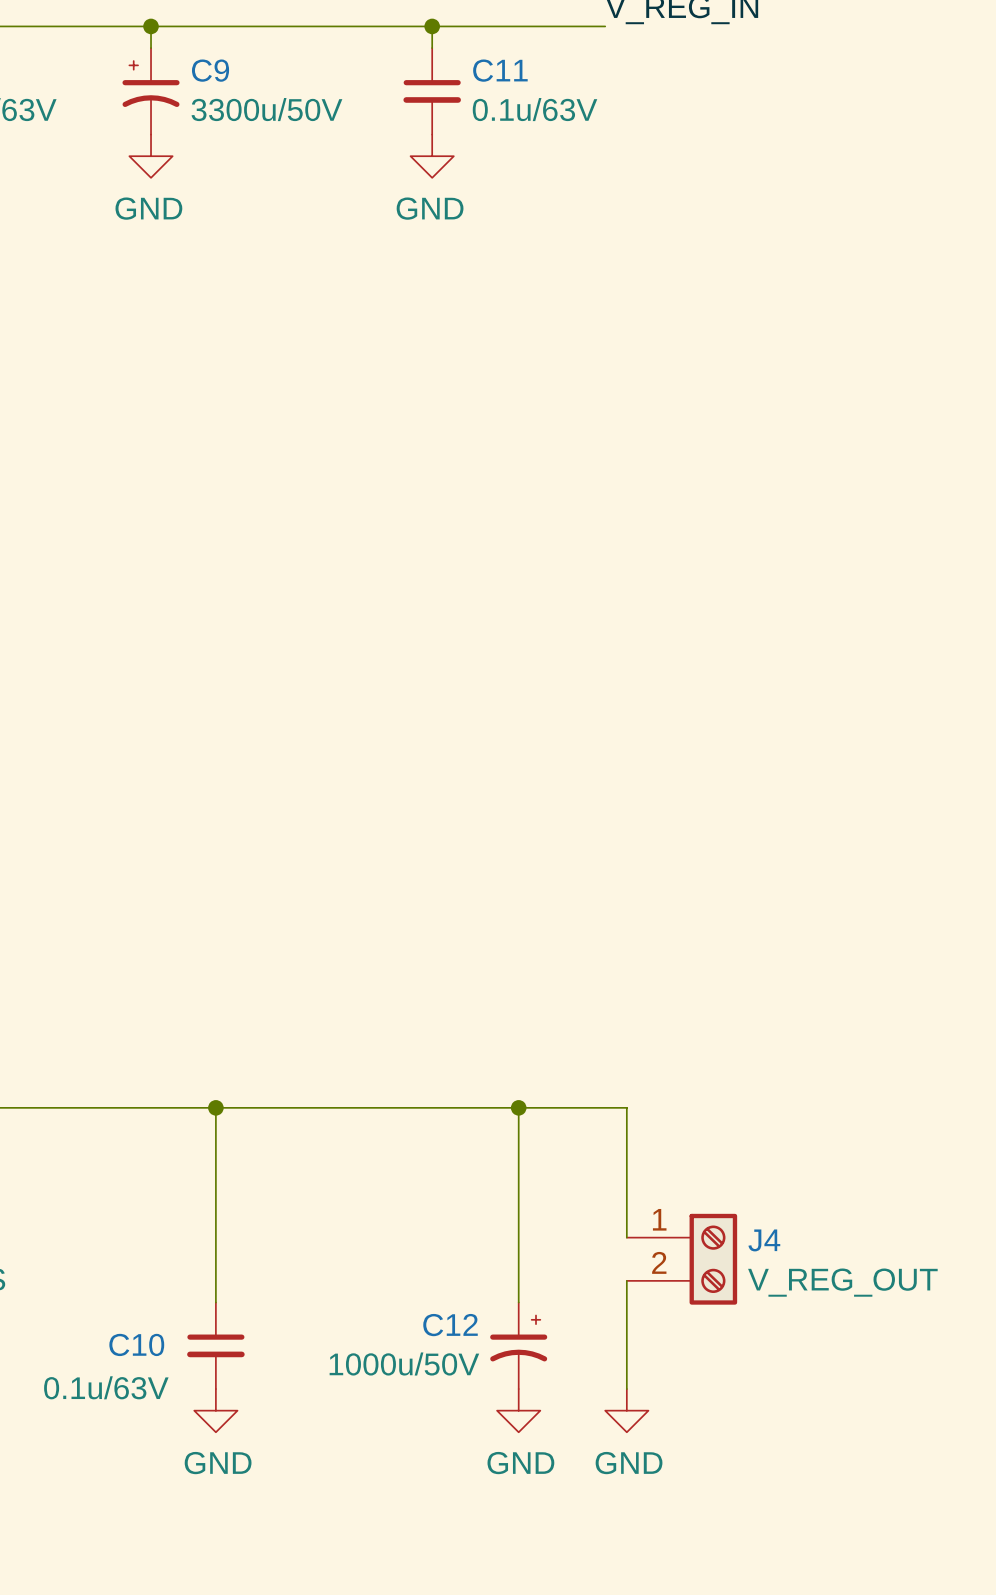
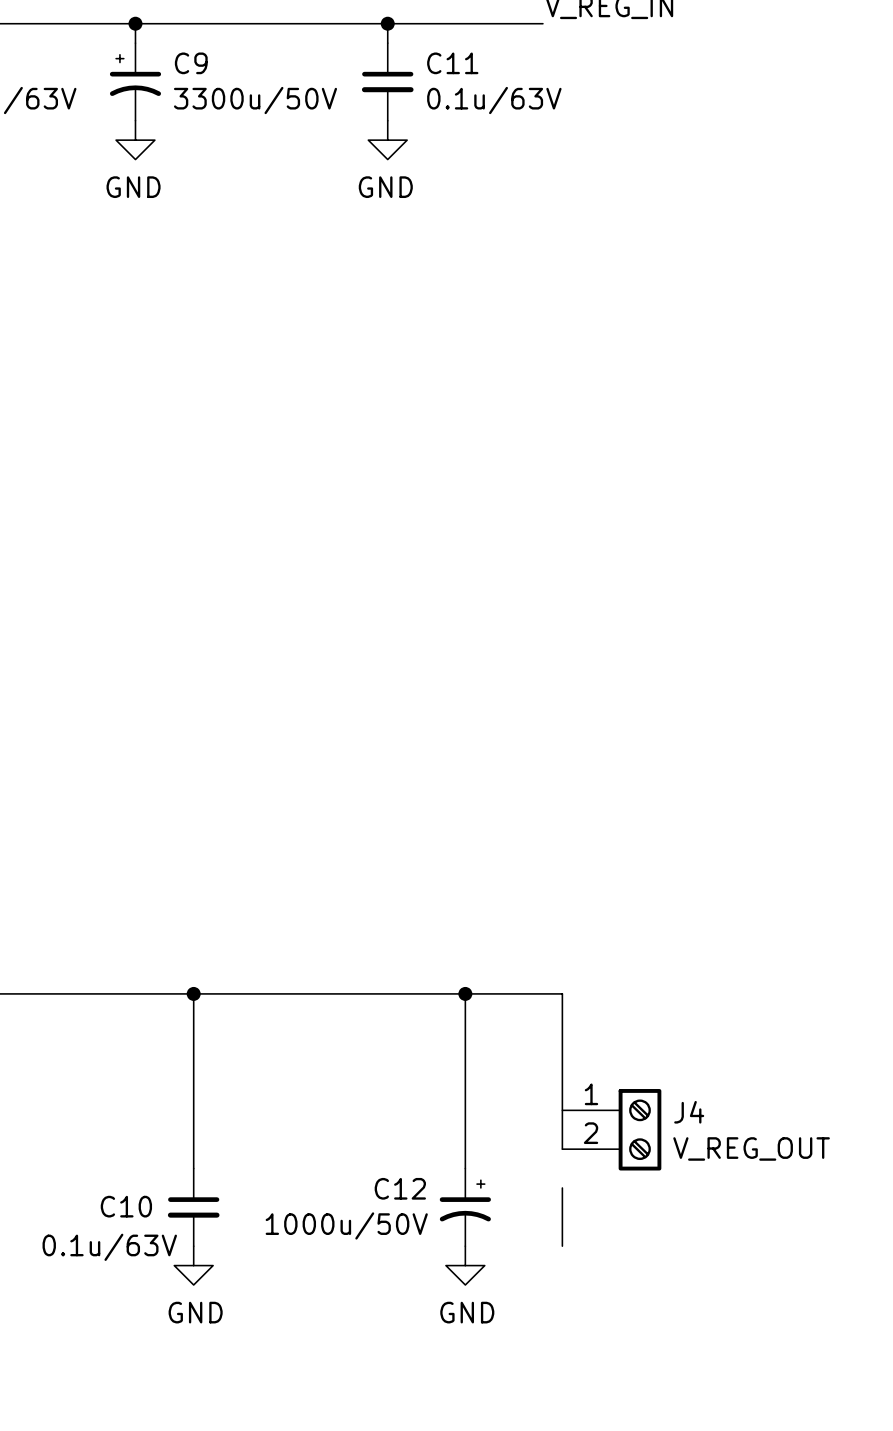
wire: (626, 1280) (626, 1324) -> (562, 1149) (562, 1110)
power symbol: GND (626, 1410) -> none

